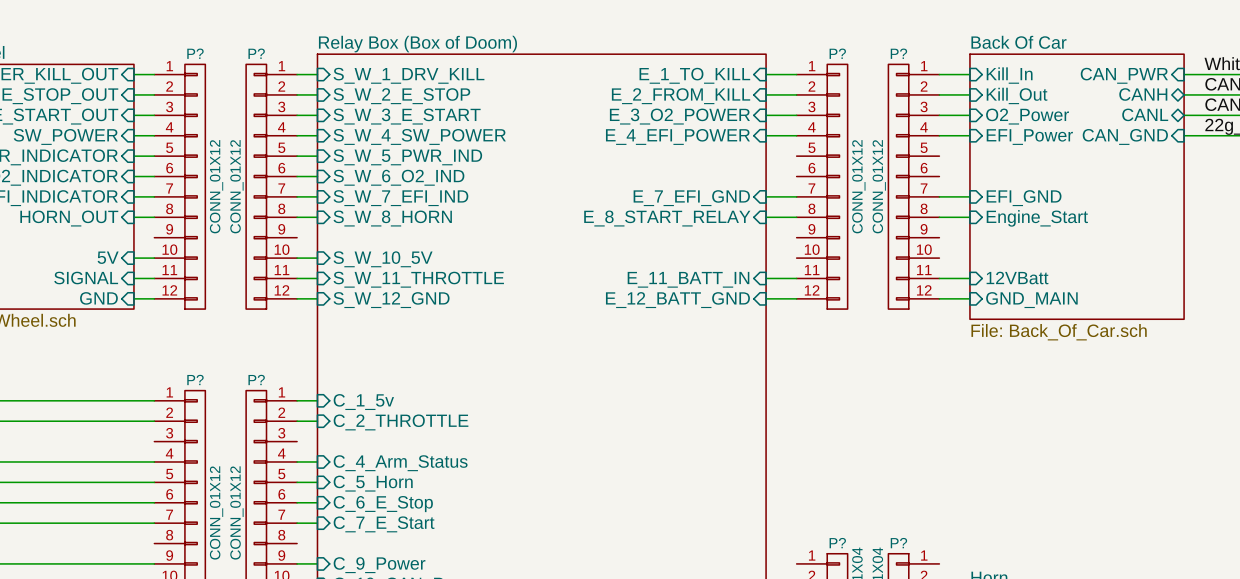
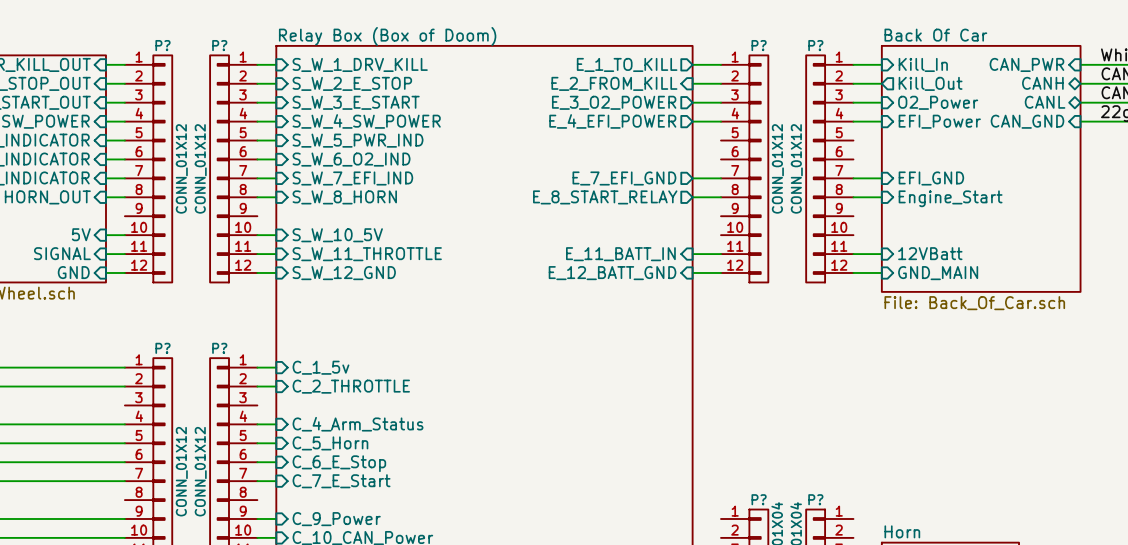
sheet pin shape: input (694, 75) -> output (627, 64)
sheet pin shape: input (1017, 95) -> output (930, 83)
sheet pin shape: input (679, 116) -> output (614, 102)
sheet pin shape: input (677, 136) -> output (612, 121)
sheet pin shape: input (691, 198) -> output (624, 178)
sheet pin shape: input (667, 218) -> output (605, 197)

